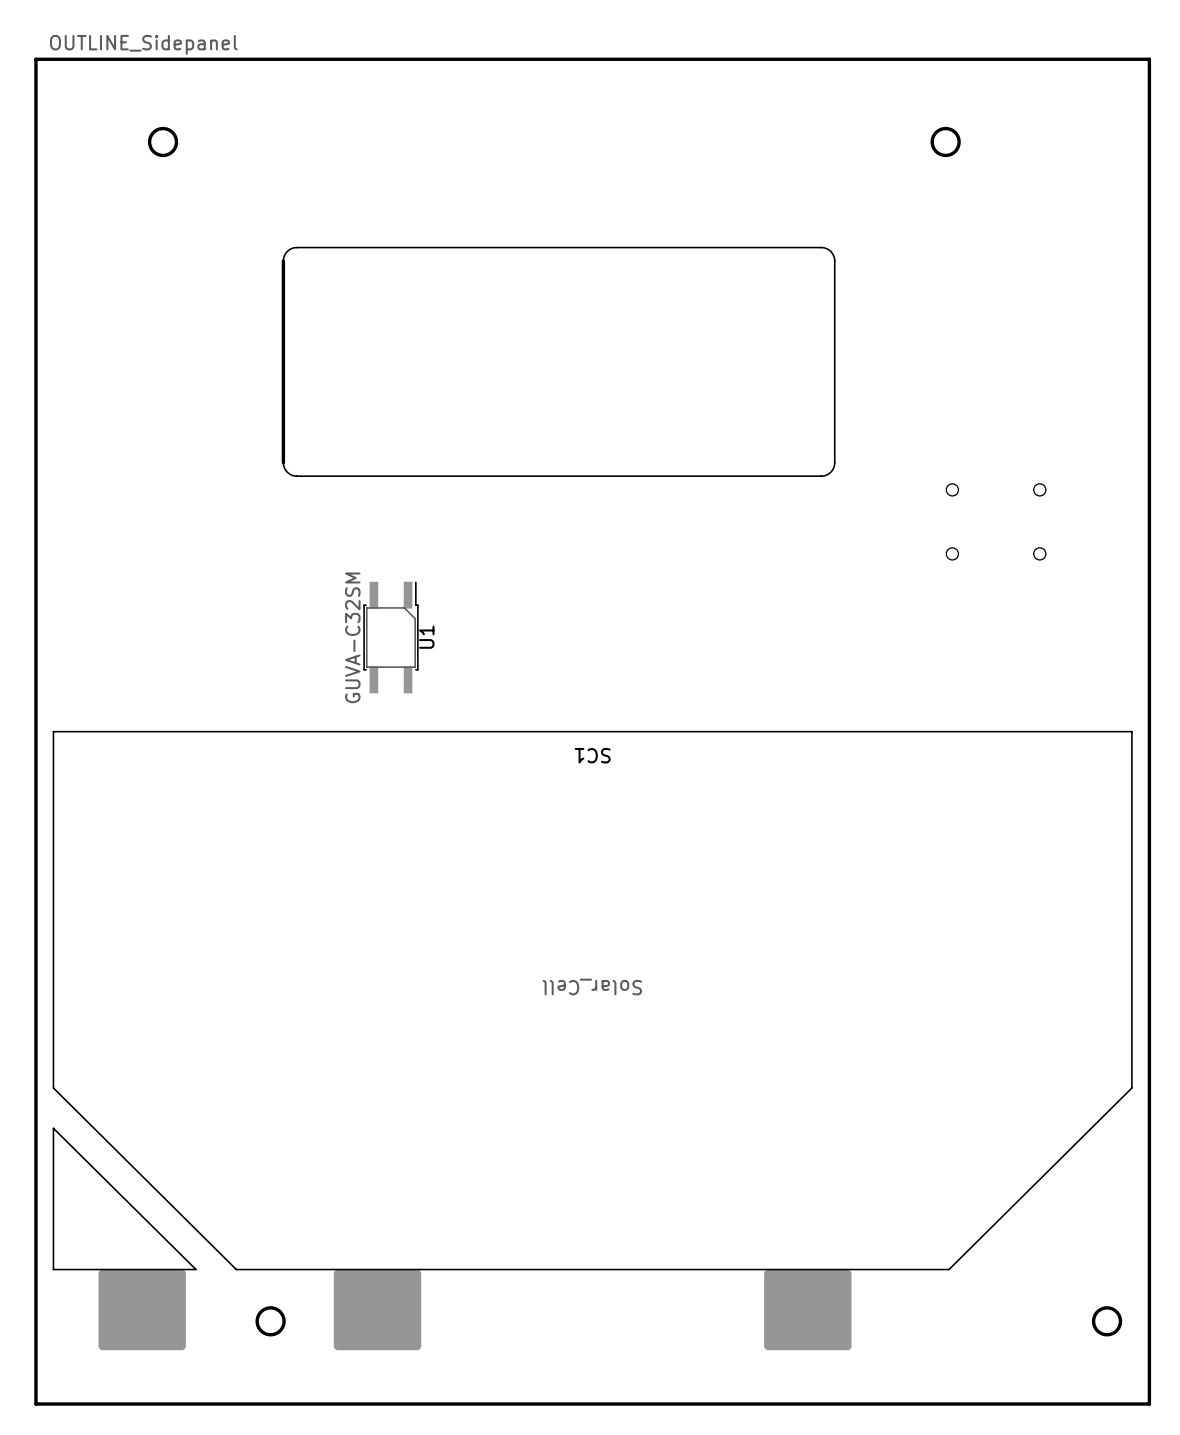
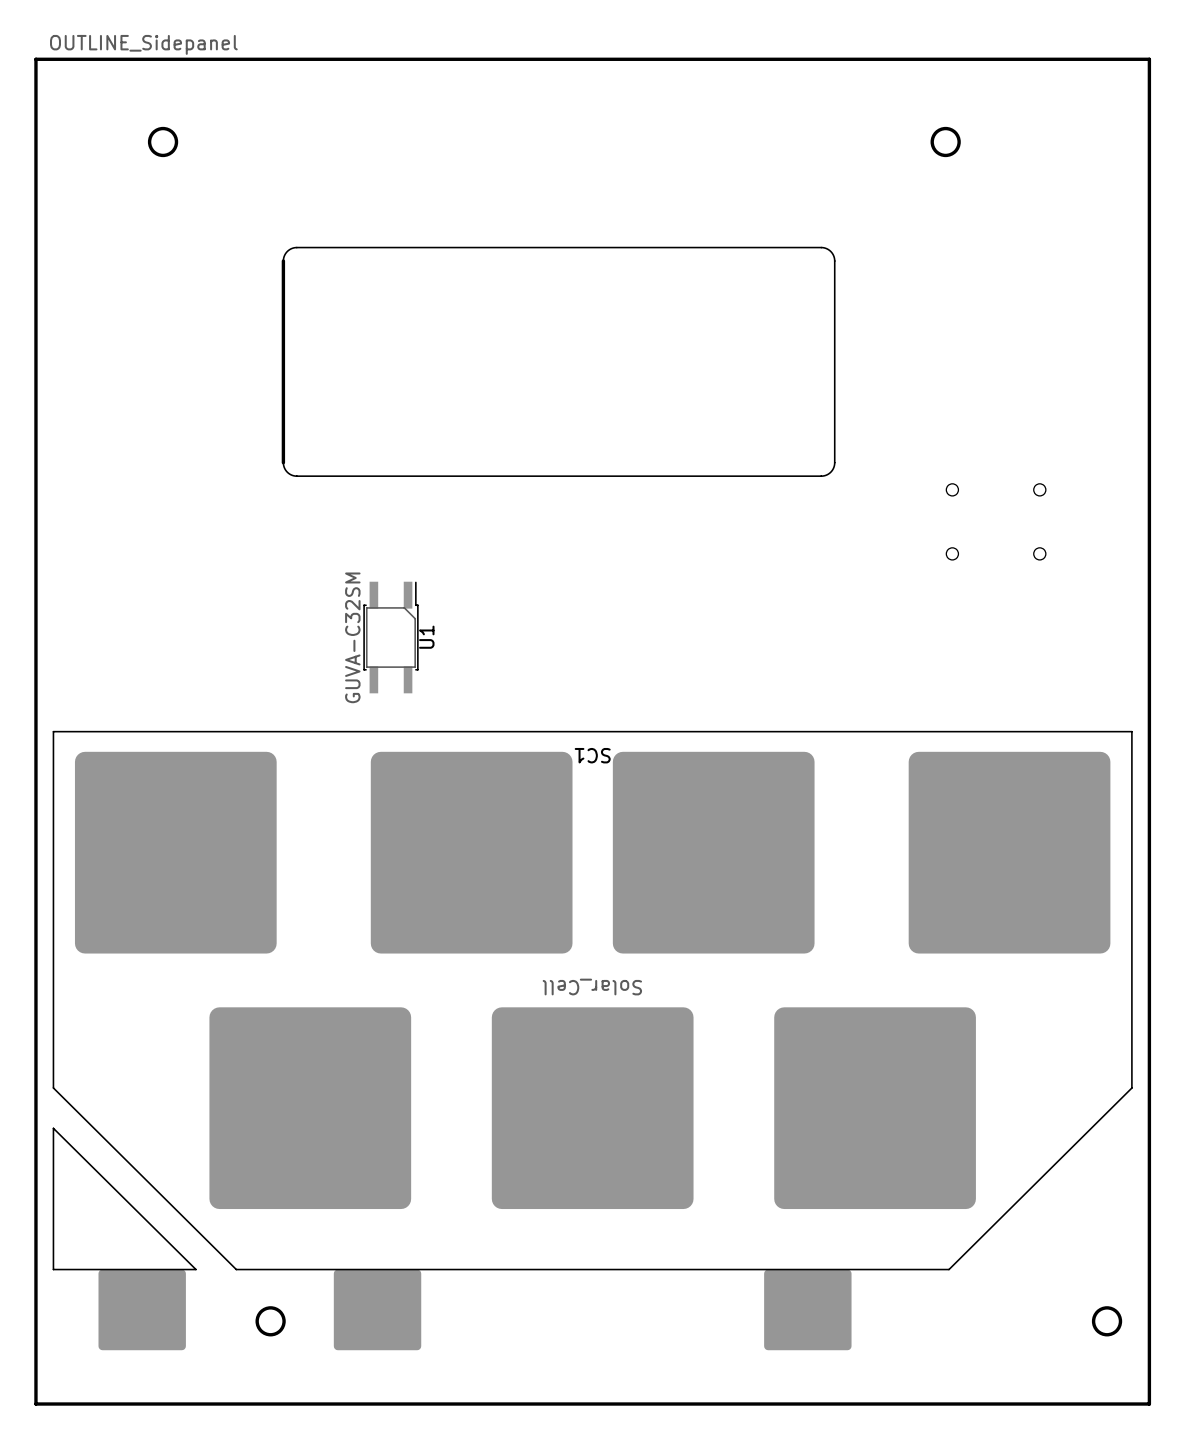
SC1 footprint: [52, 730, 1133, 1351] -> [52, 730, 1133, 1351]

